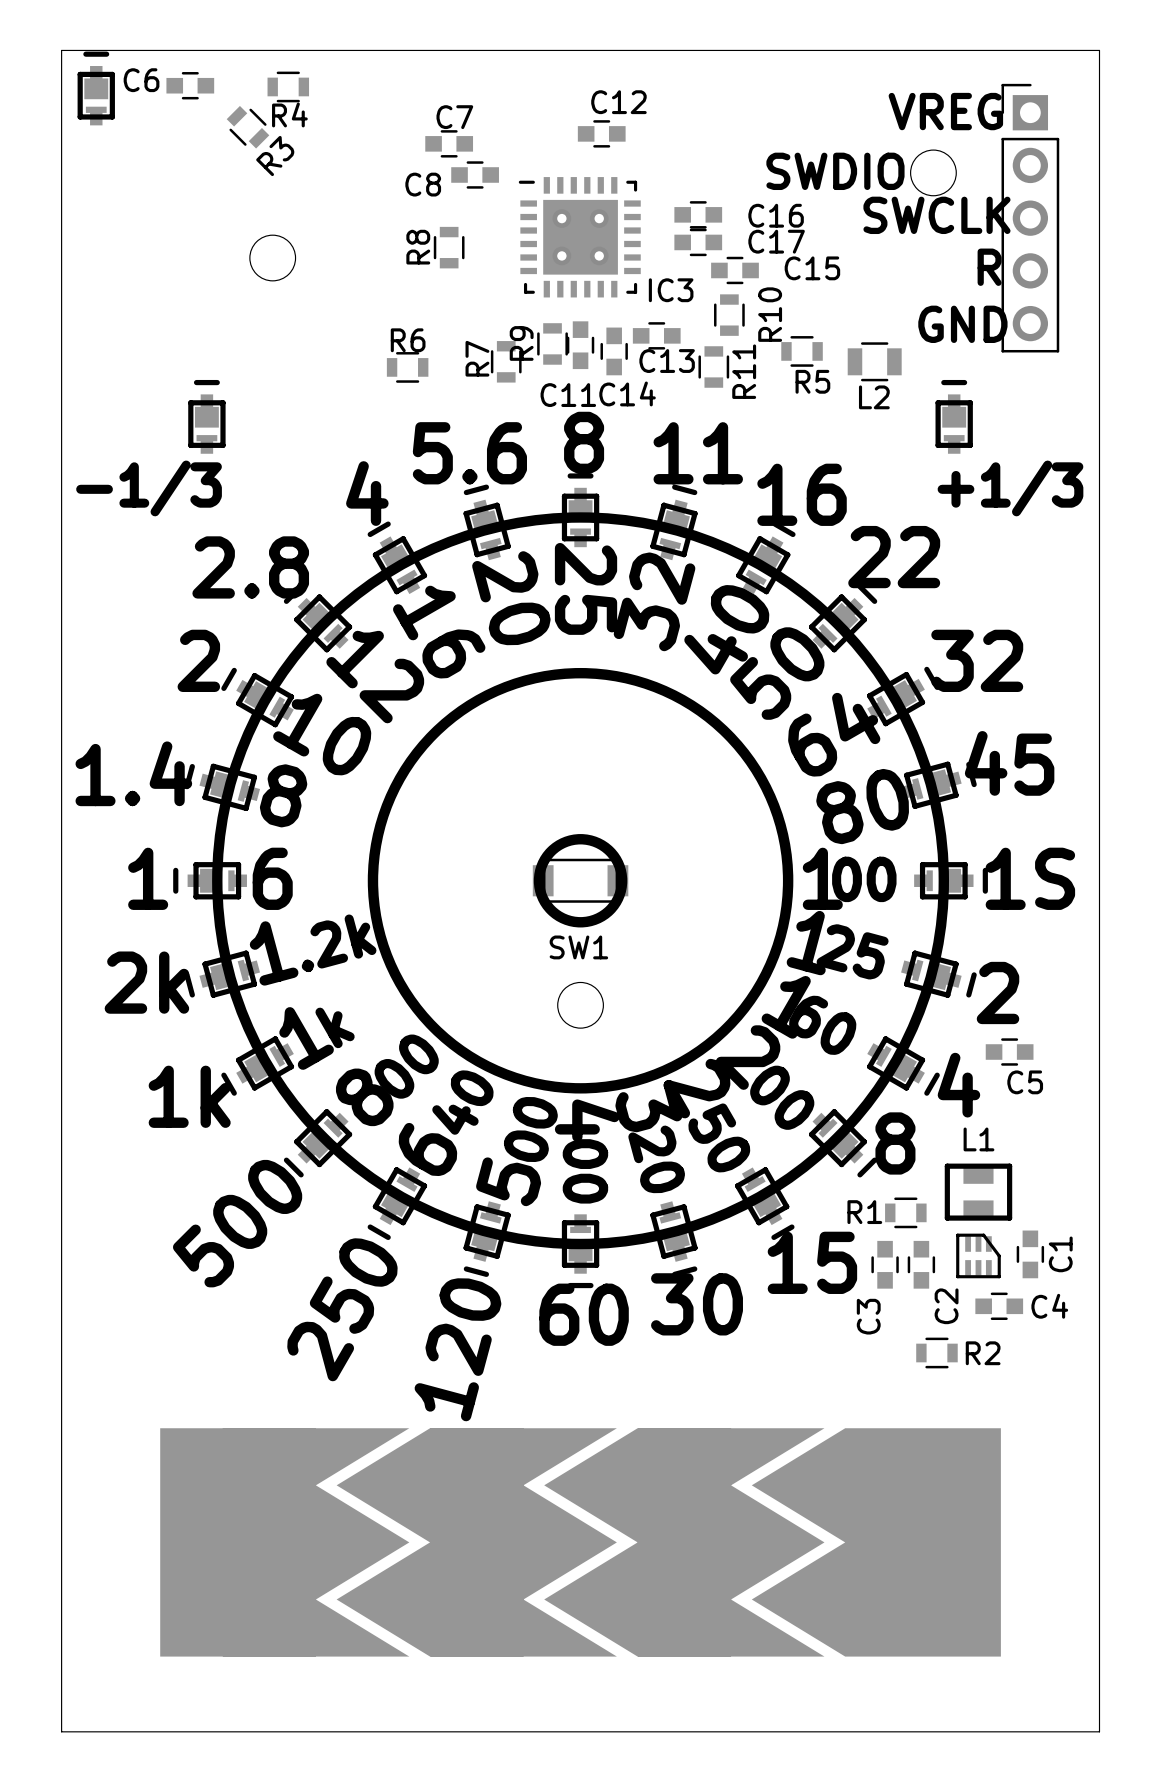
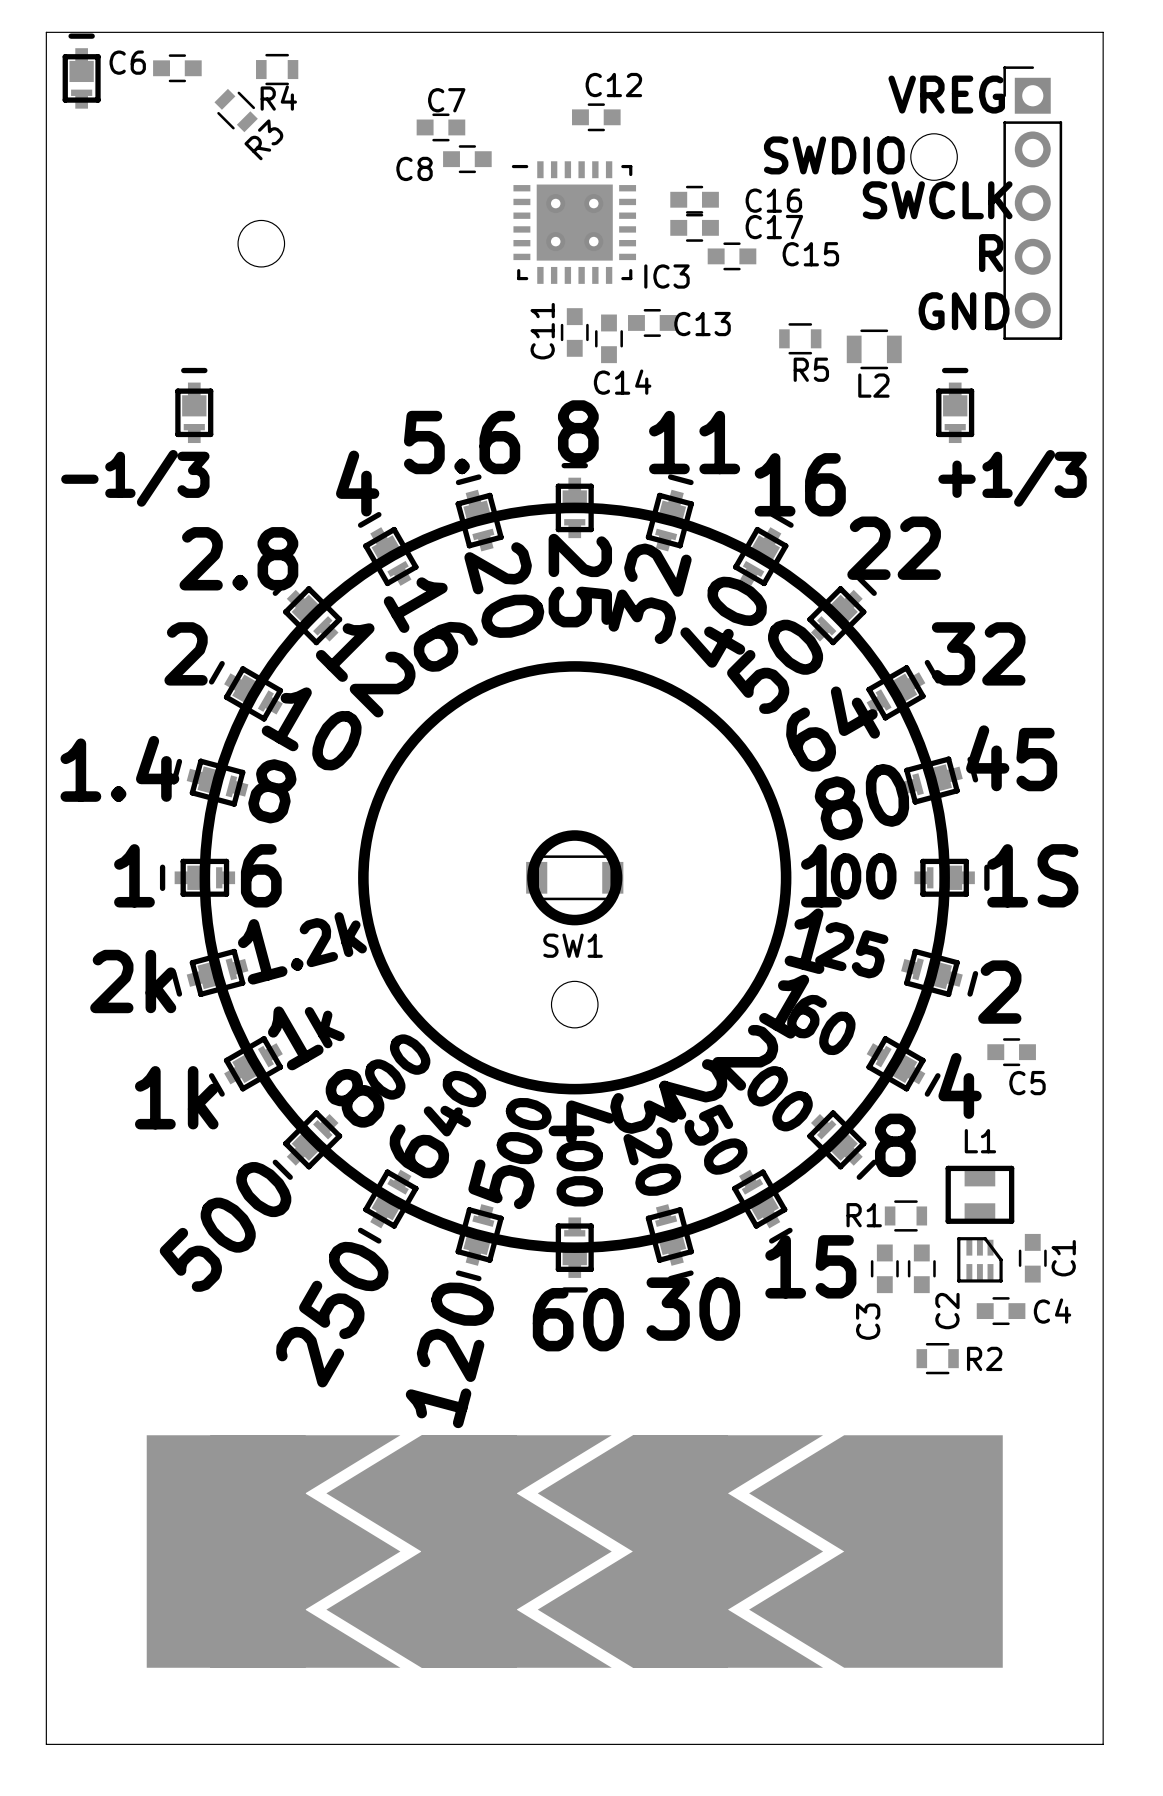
R8: (449, 247) -> none
R10: (729, 315) -> none
R9: (552, 343) -> none
R7: (506, 361) -> none
C13 name position: C13 (667, 361) -> C13 (702, 324)
R11: (713, 366) -> none
R6: (407, 367) -> none
C11 name rotation: 0° (568, 395) -> 90° counterclockwise (542, 331)

